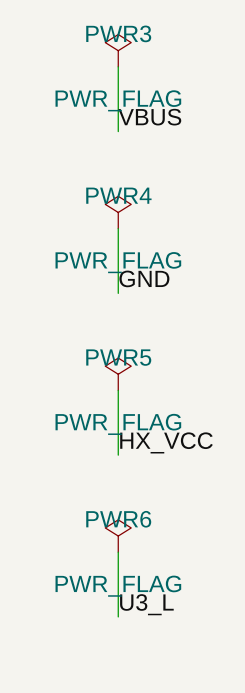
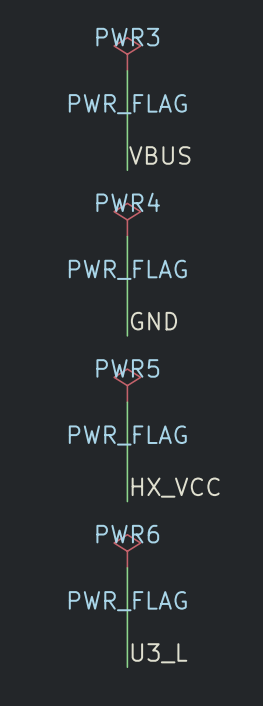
label position: VBUS (149, 117) -> VBUS (159, 155)
wire: none -> (127, 137) (127, 170)
label position: GND (144, 278) -> GND (153, 321)
wire: none -> (127, 302) (127, 335)
label position: HX_VCC (166, 442) -> HX_VCC (175, 487)
wire: none -> (127, 468) (127, 501)
label position: U3_L (146, 604) -> U3_L (159, 653)
wire: none -> (127, 634) (127, 667)

